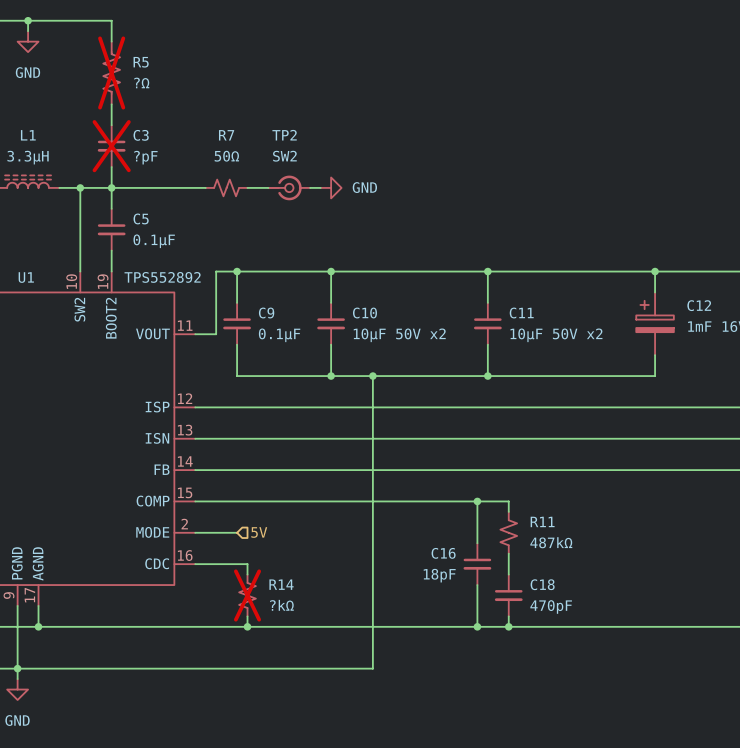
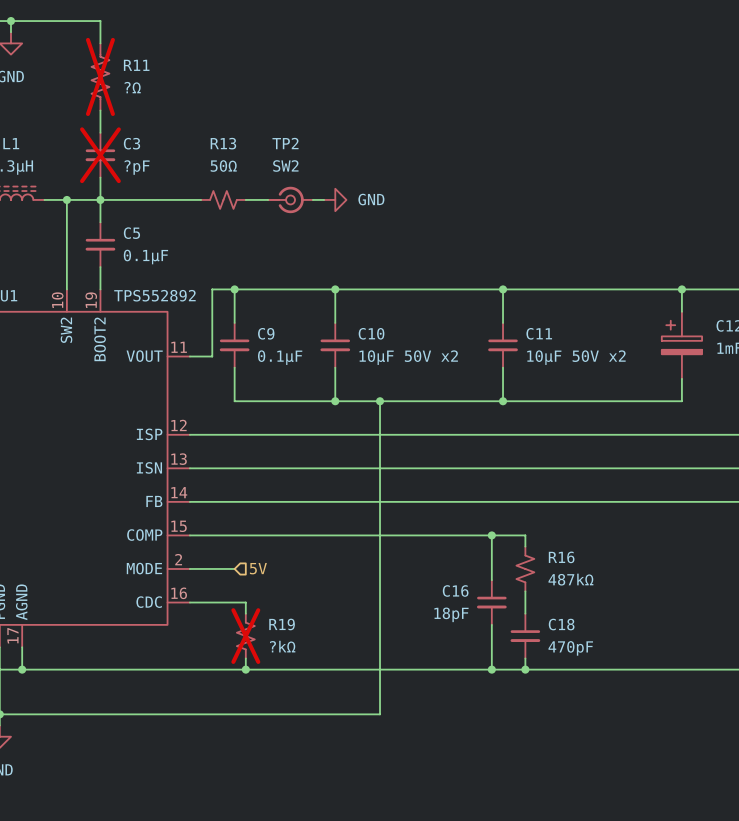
R5 name: R5 (141, 62) -> R11 (136, 65)
R7 name: R7 (226, 135) -> R13 (223, 143)
R11 name: R11 (542, 521) -> R16 (561, 557)
R14 name: R14 (281, 584) -> R19 (282, 624)

